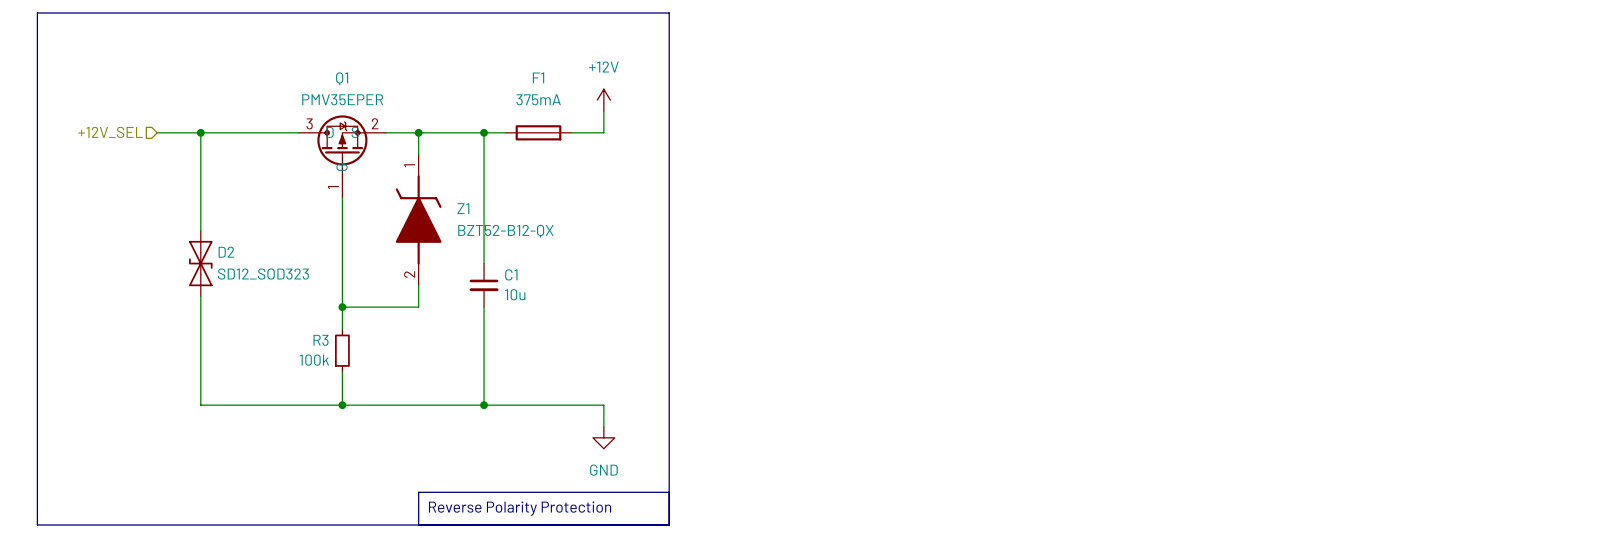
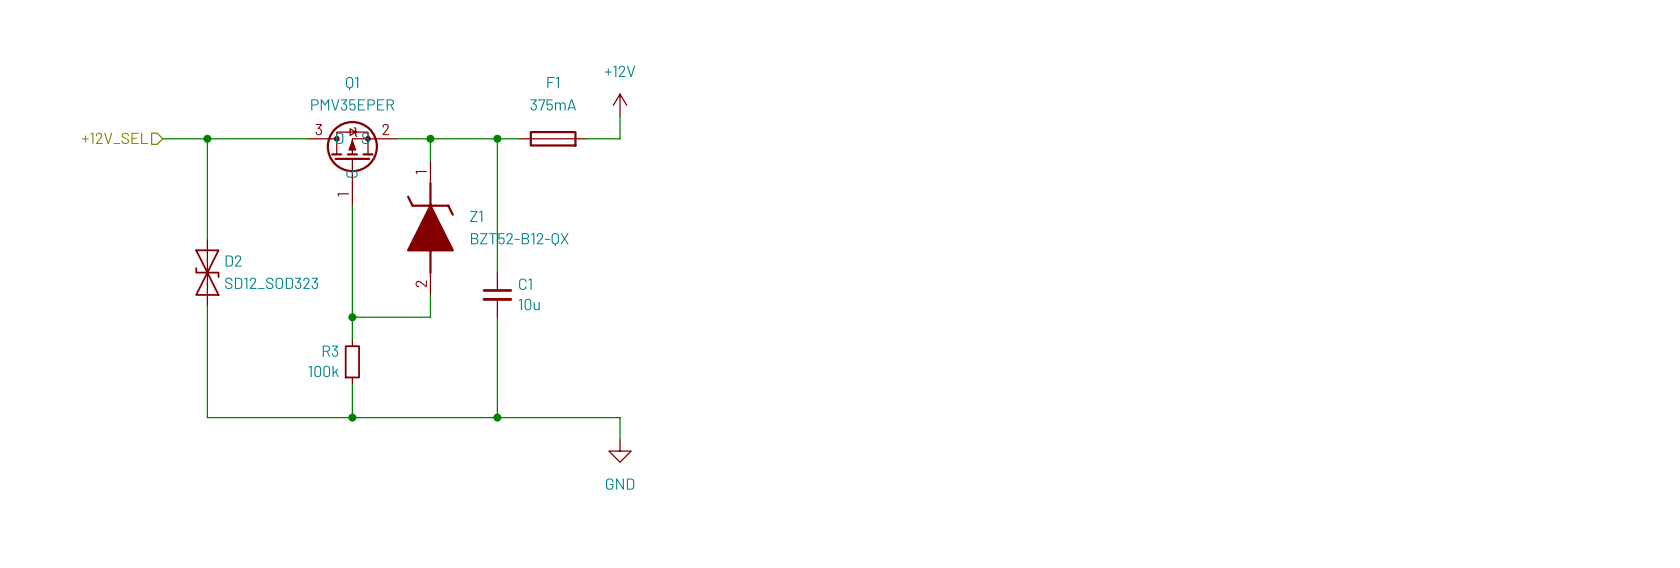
line: (37, 13) (669, 13) (669, 524) (37, 524) (37, 13) -> none
line: (669, 492) (418, 492) (418, 524) -> none
text: Reverse Polarity Protection (520, 508) -> none

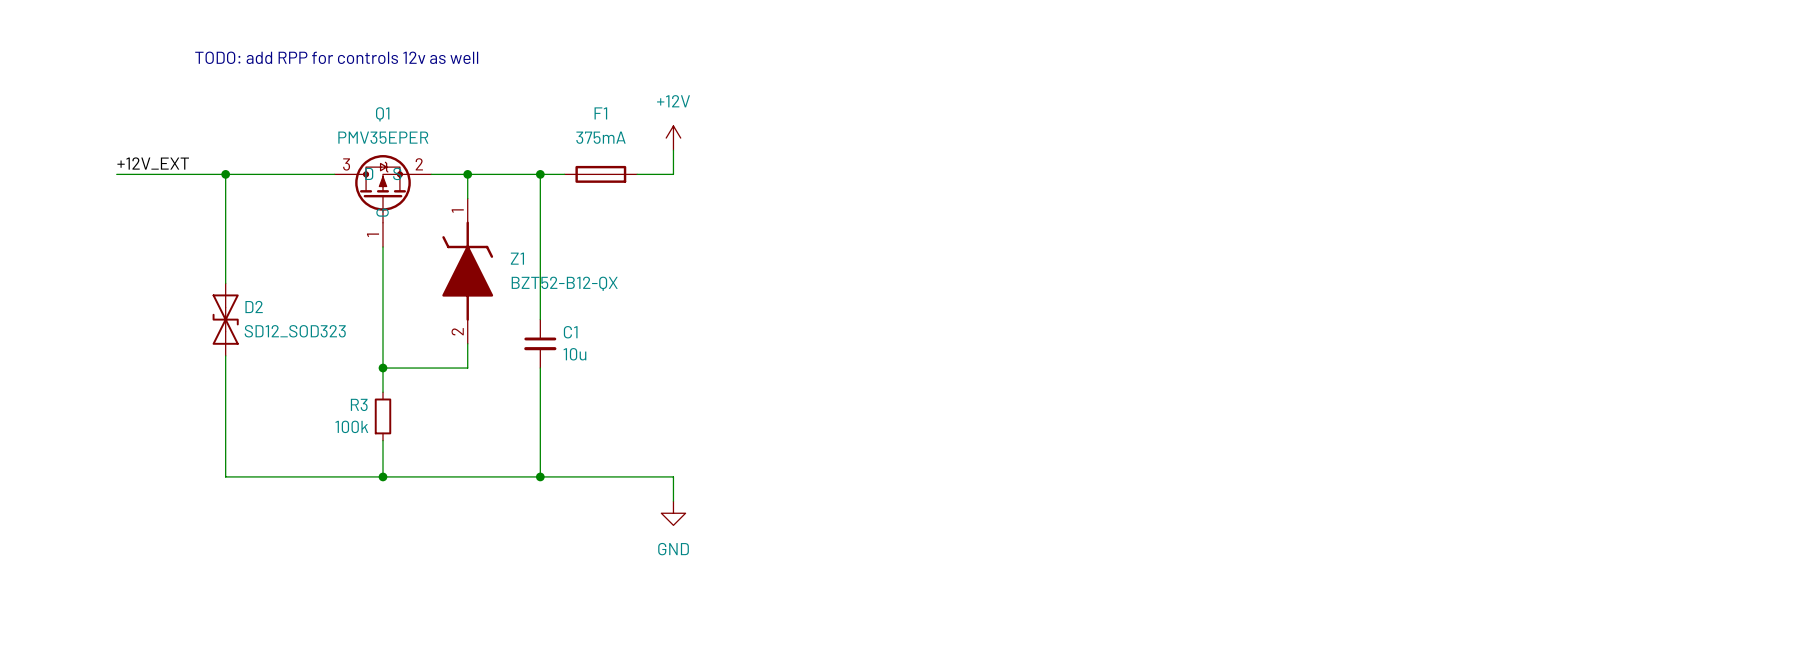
text: none -> TODO: add RPP for controls 12v as well (336, 57)
label: none -> +12V_EXT (153, 163)
wire: none -> (116, 174) (177, 174)
hierarchical label: +12V_SEL (115, 138) -> none

